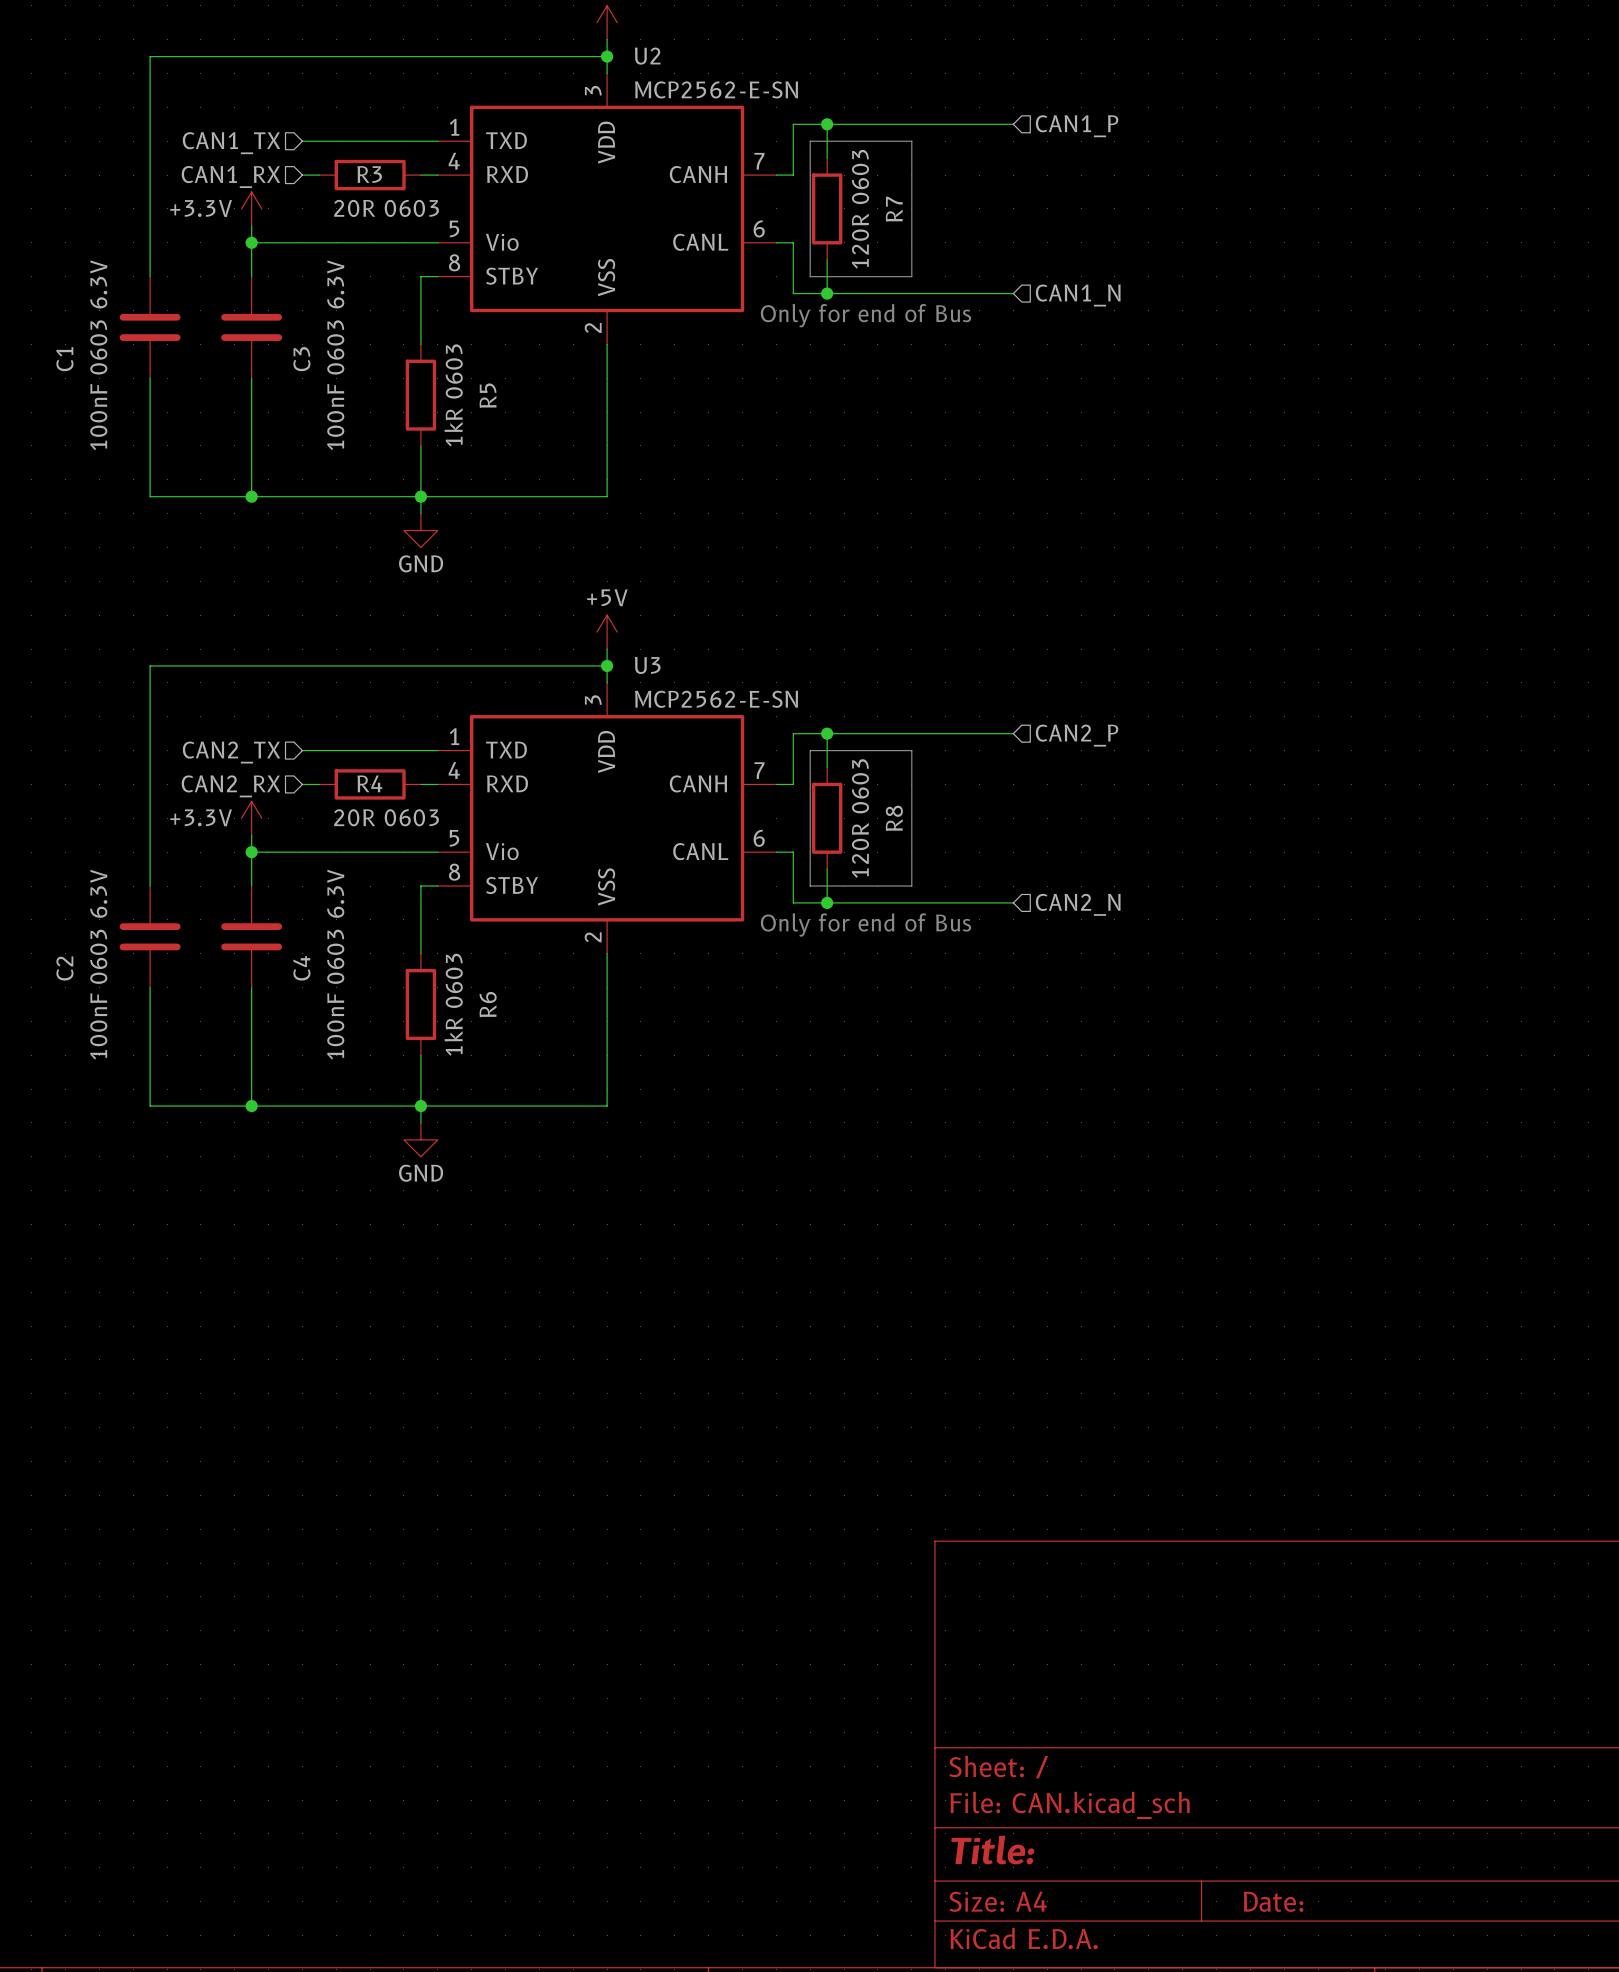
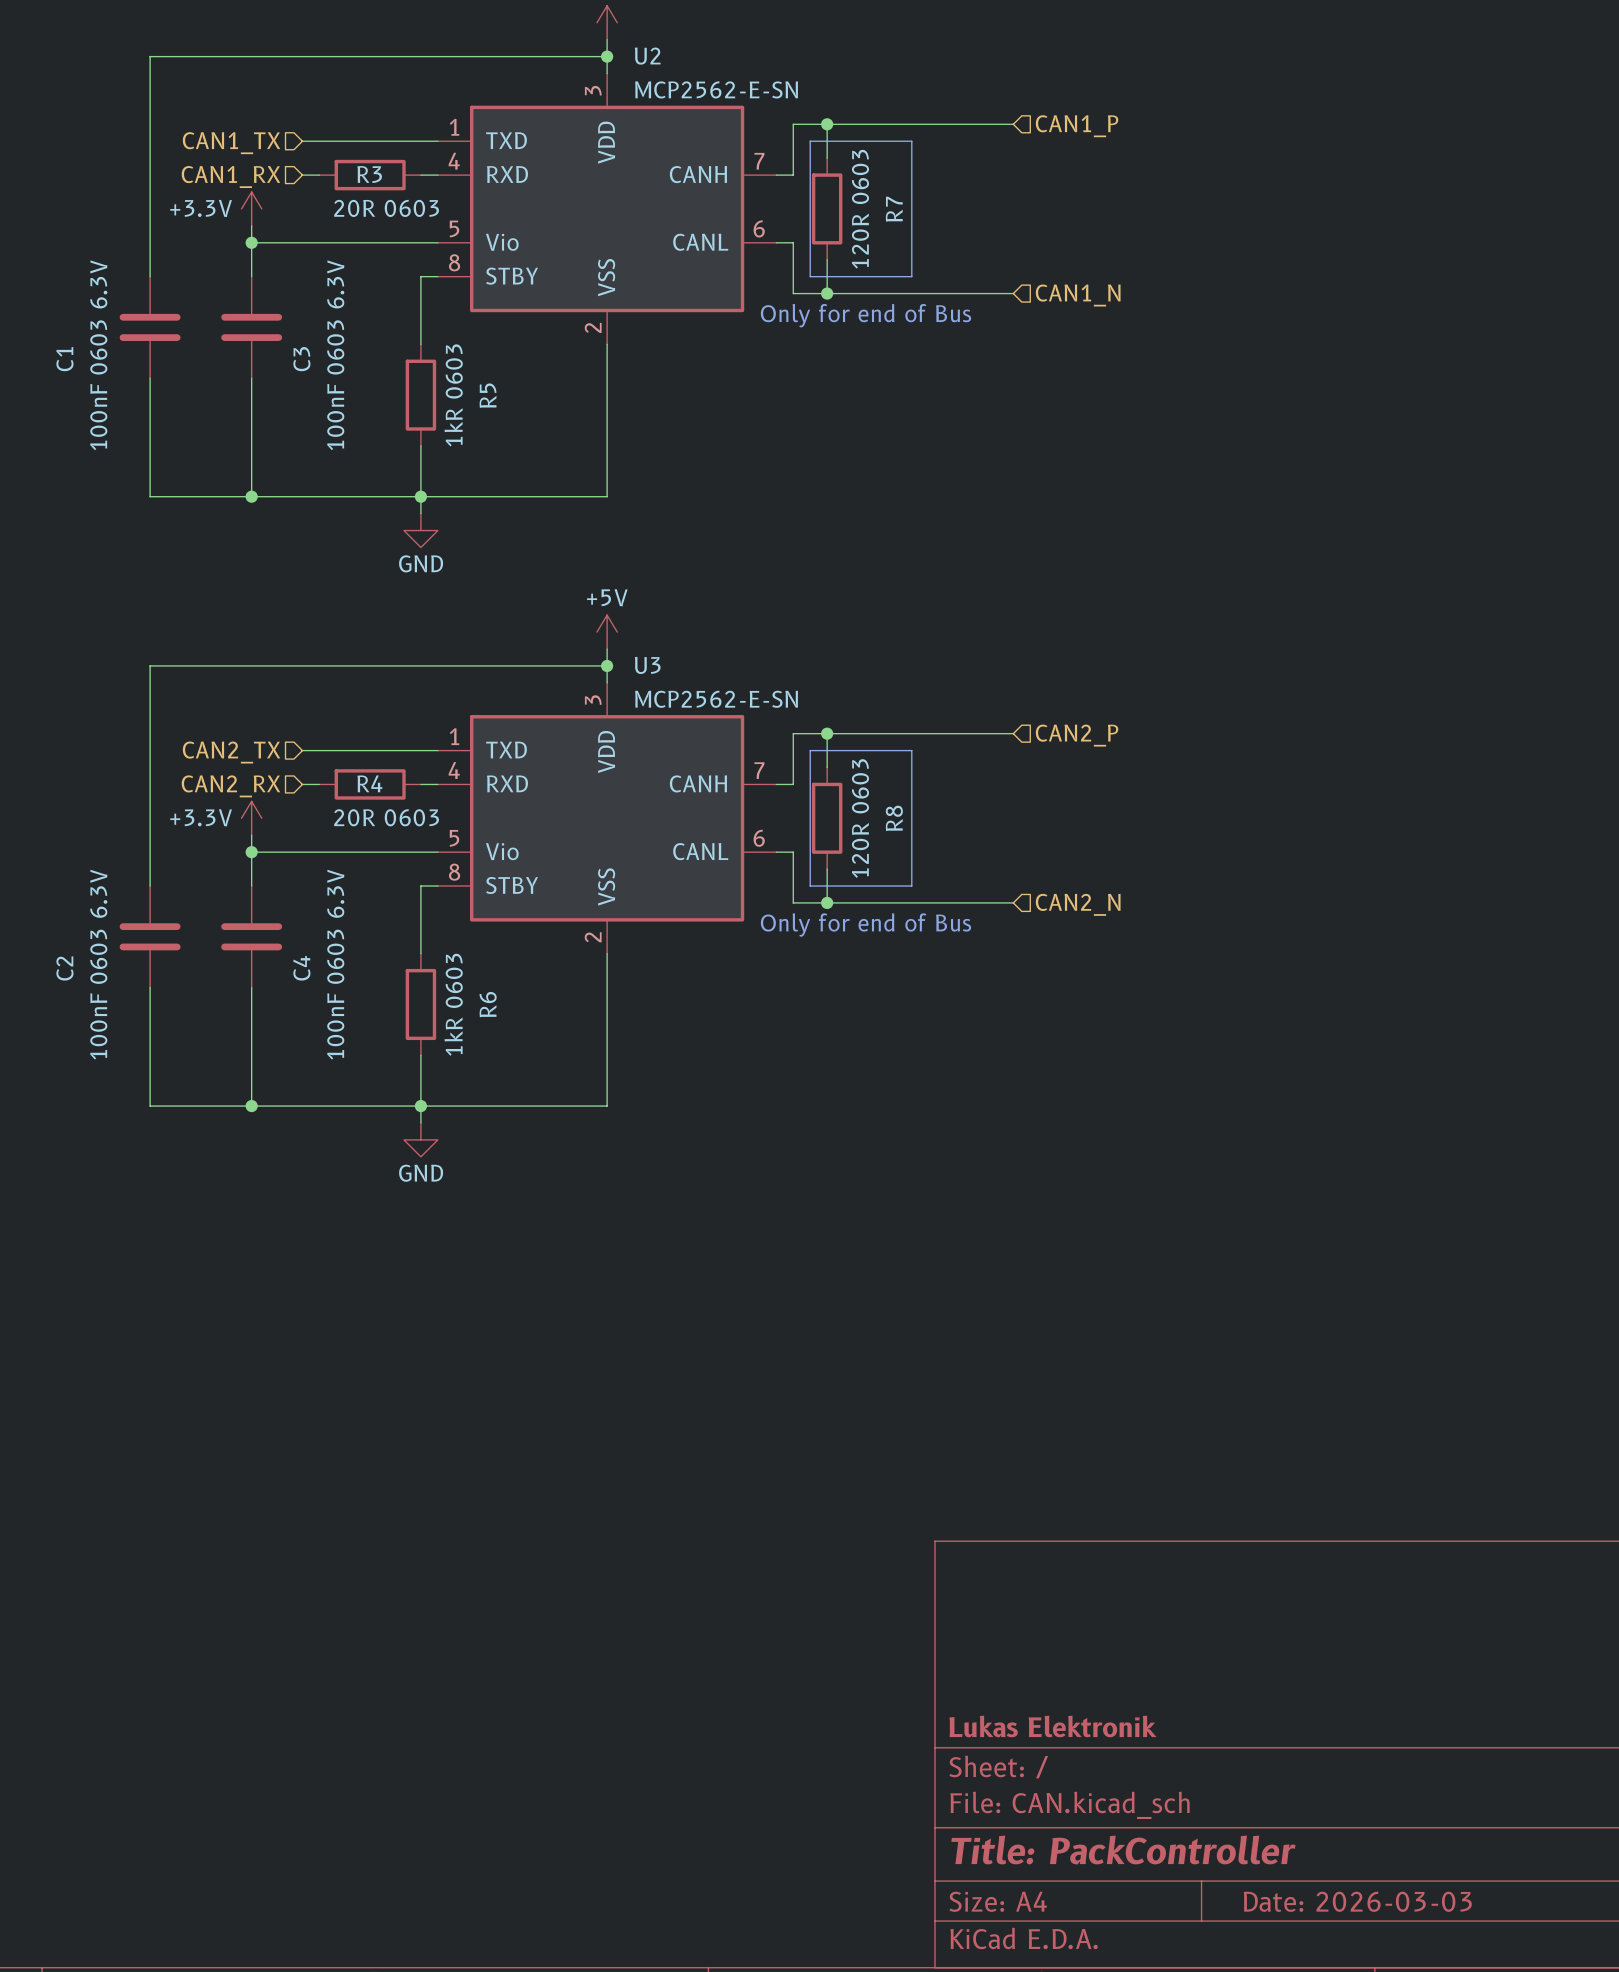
title block: none -> Lukas Elektronik (1052, 1726)
title block: Title: (992, 1849) -> Title: PackController (1123, 1849)
title block: Date: (1273, 1901) -> Date: 2026-03-03 (1357, 1901)

